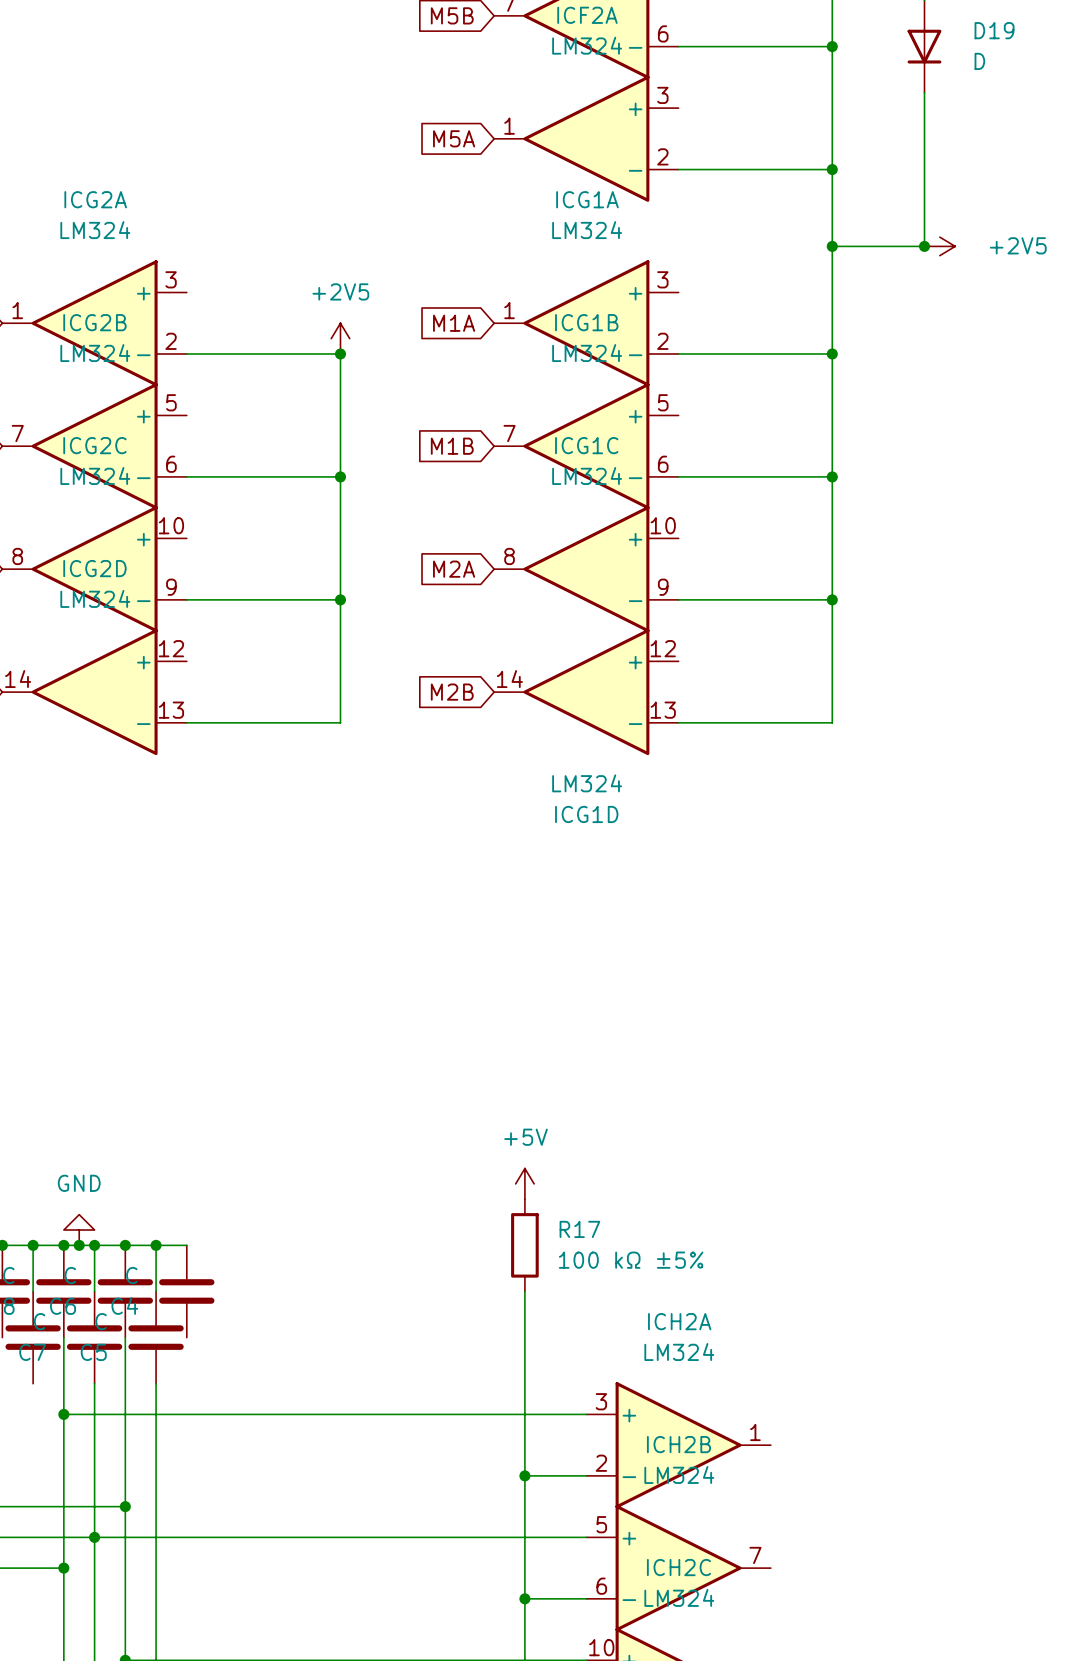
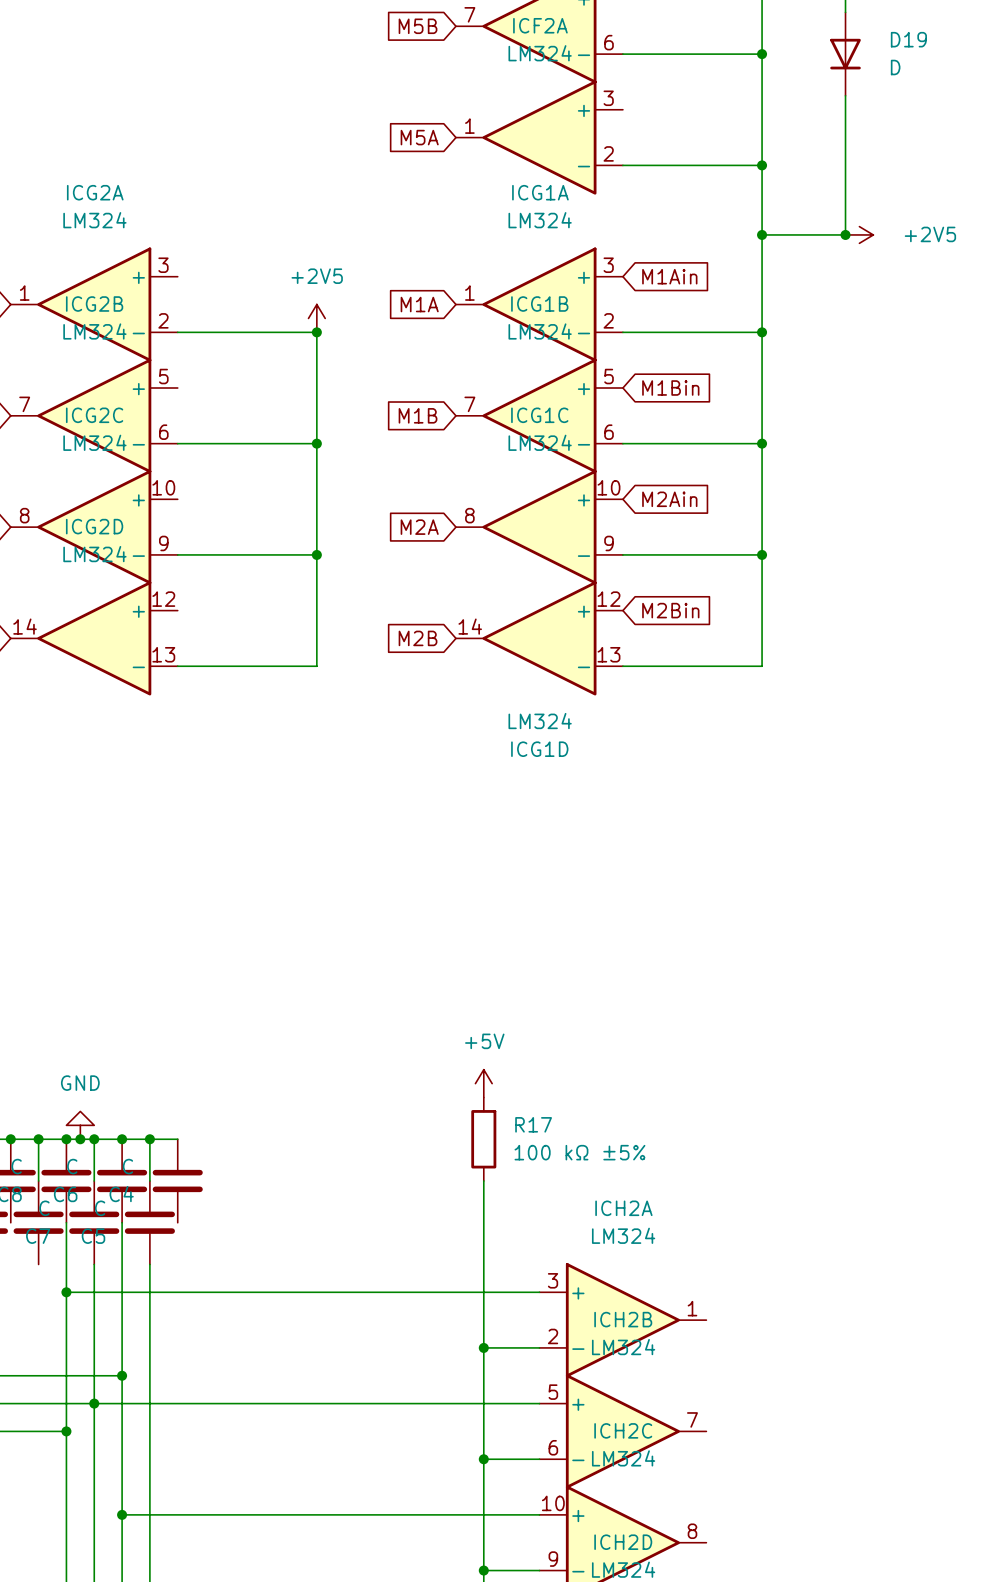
global label: none -> M1Ain (669, 276)
global label: none -> M1Bin (670, 388)
global label: none -> M2Ain (669, 499)
global label: none -> M2Bin (670, 610)

